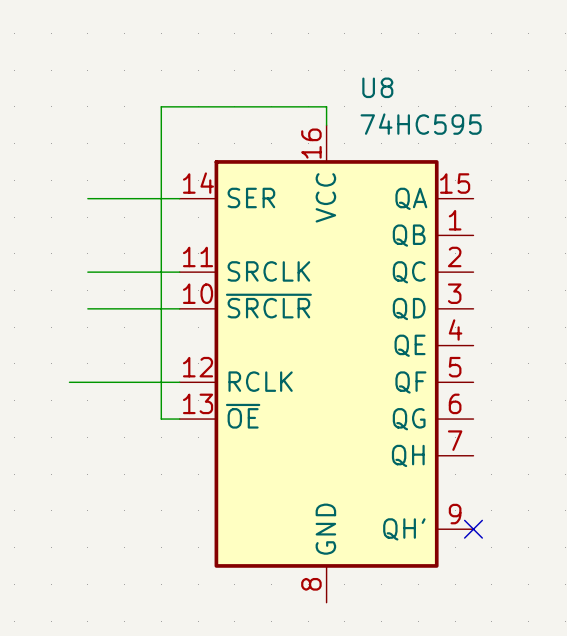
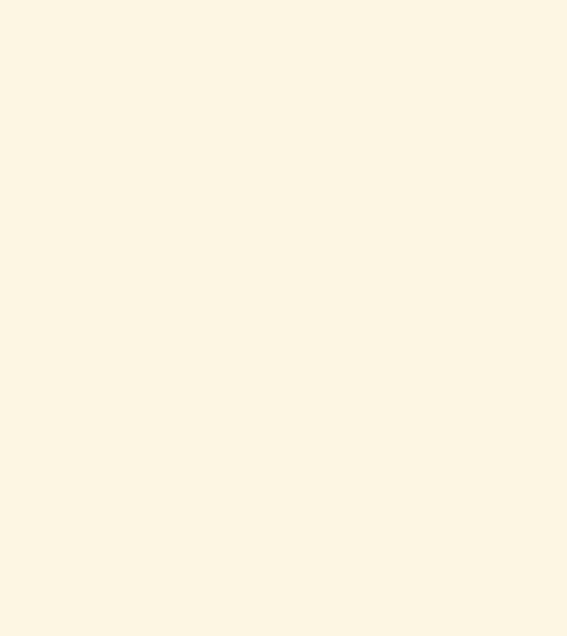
wire: (326, 125) (326, 106) (161, 106) (161, 419) (179, 419) -> none
wire: (87, 198) (179, 198) -> none
wire: (87, 272) (179, 272) -> none
wire: (87, 308) (179, 308) -> none
U8: 74HC595 (326, 363) -> none
wire: (69, 382) (179, 382) -> none
no-connect mark: (473, 529) -> none

